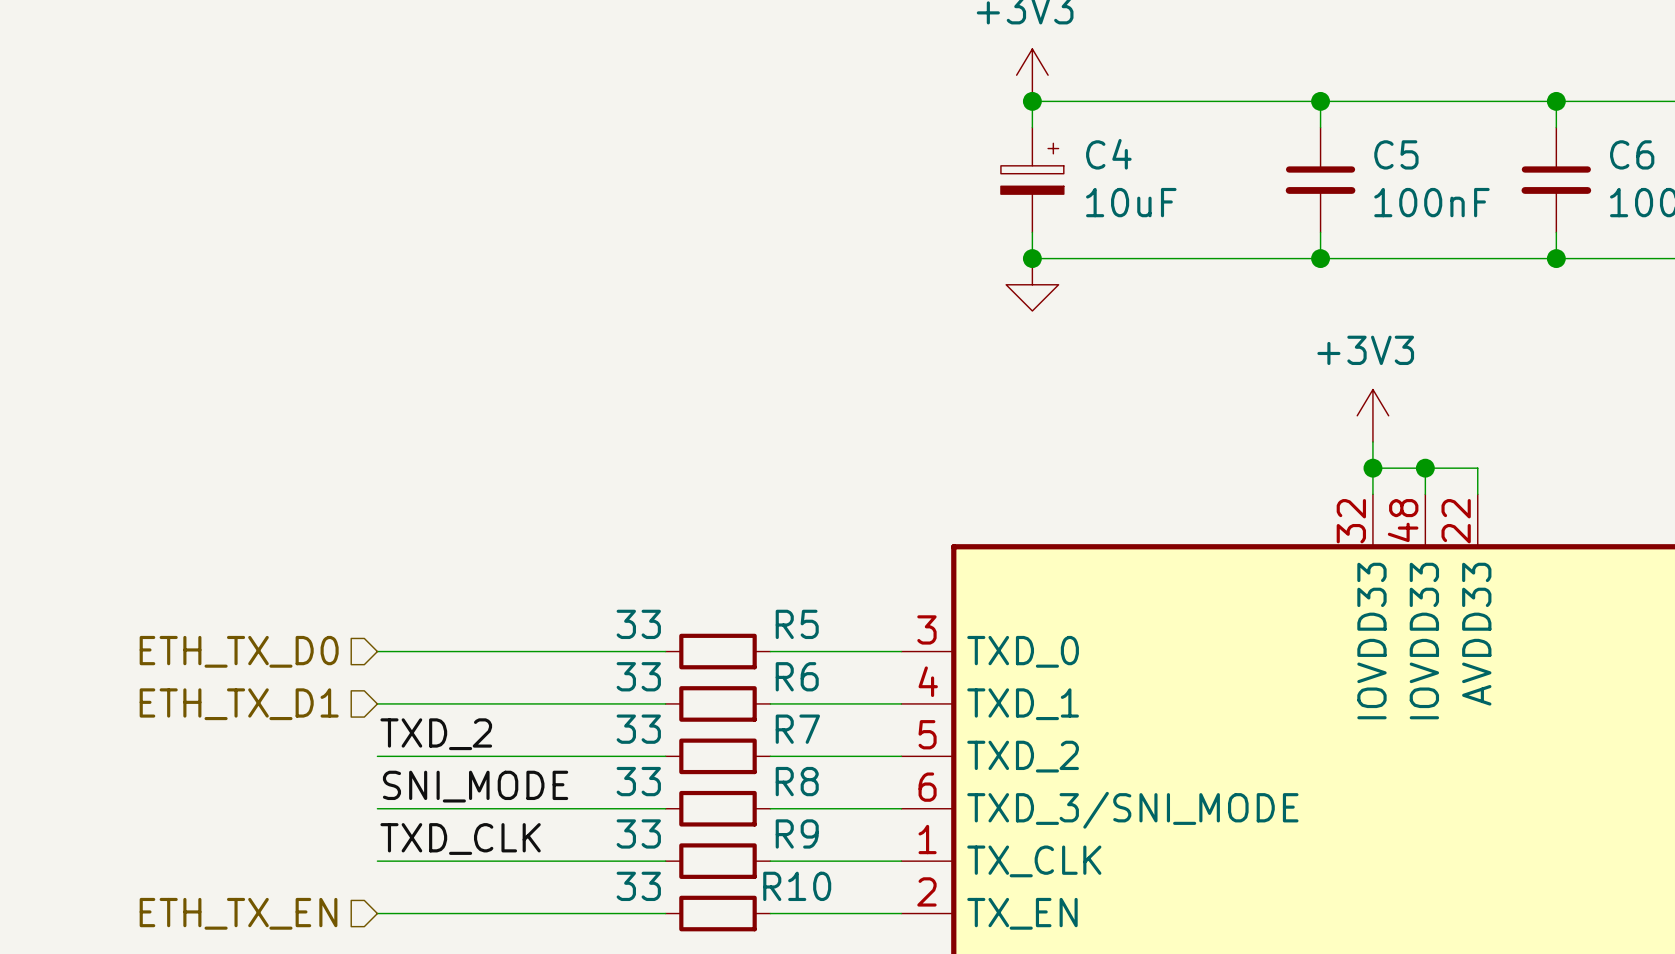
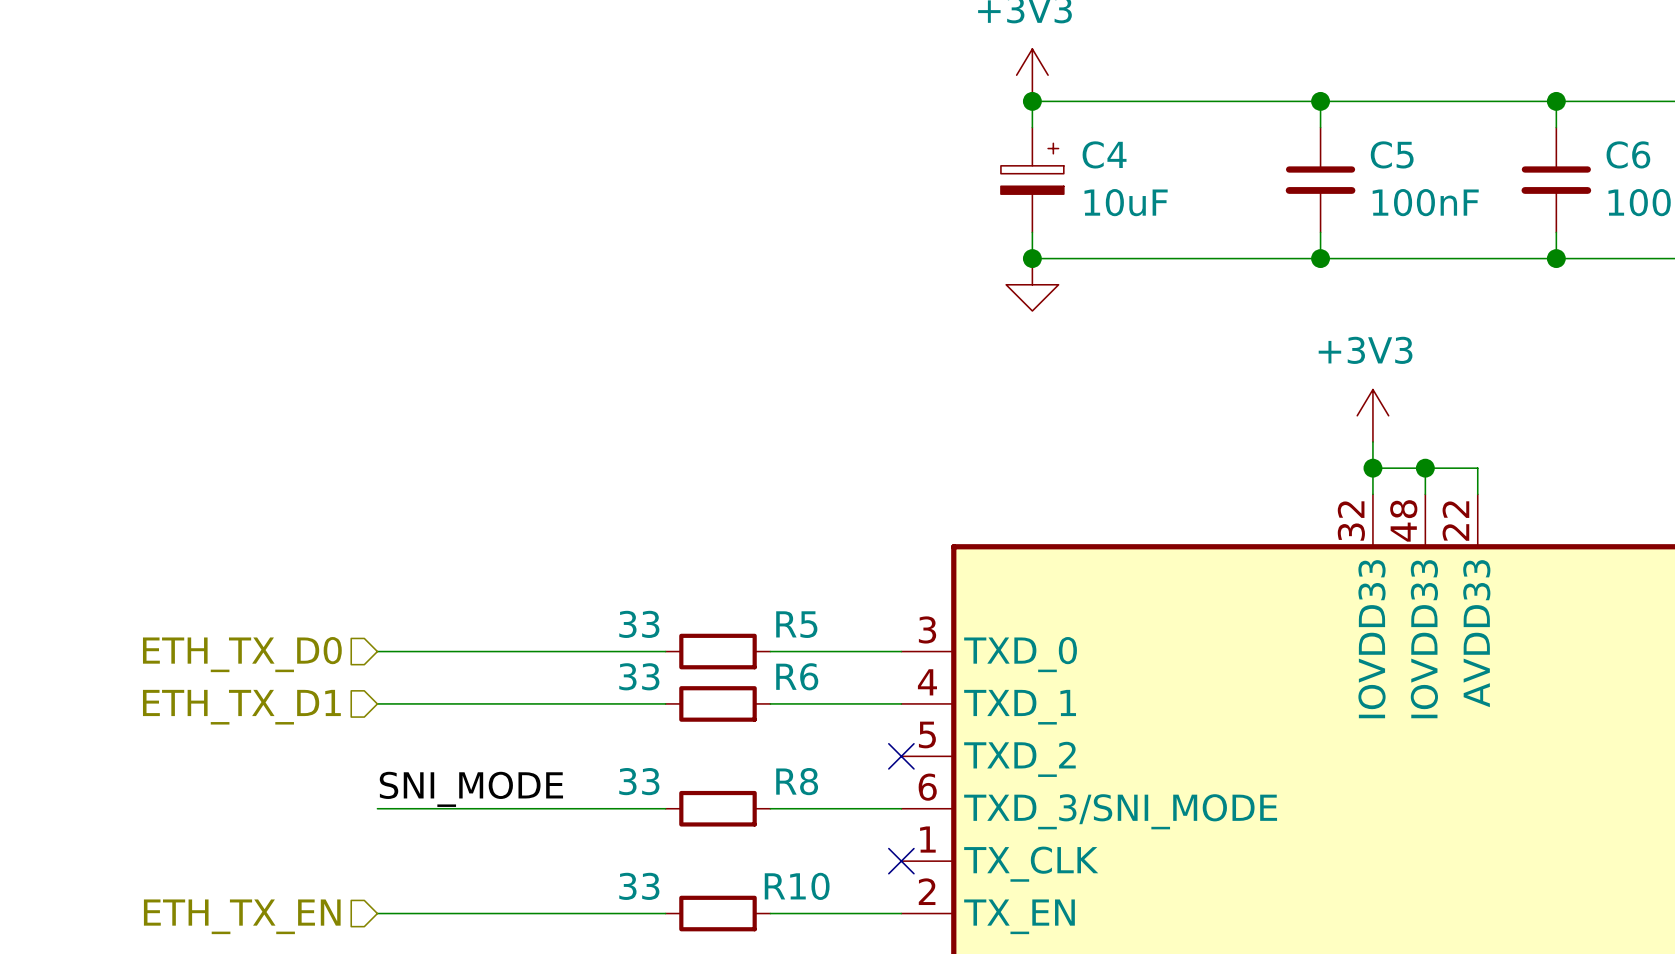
label: TXD_2 (436, 734) -> none
wire: (377, 756) (665, 756) -> none
R7: 33 (718, 756) -> none
wire: (770, 756) (901, 756) -> none
no-connect mark: none -> (901, 756)
label: TXD_CLK (460, 839) -> none
wire: (377, 861) (665, 861) -> none
R9: 33 (718, 861) -> none
wire: (770, 861) (901, 861) -> none
no-connect mark: none -> (901, 861)

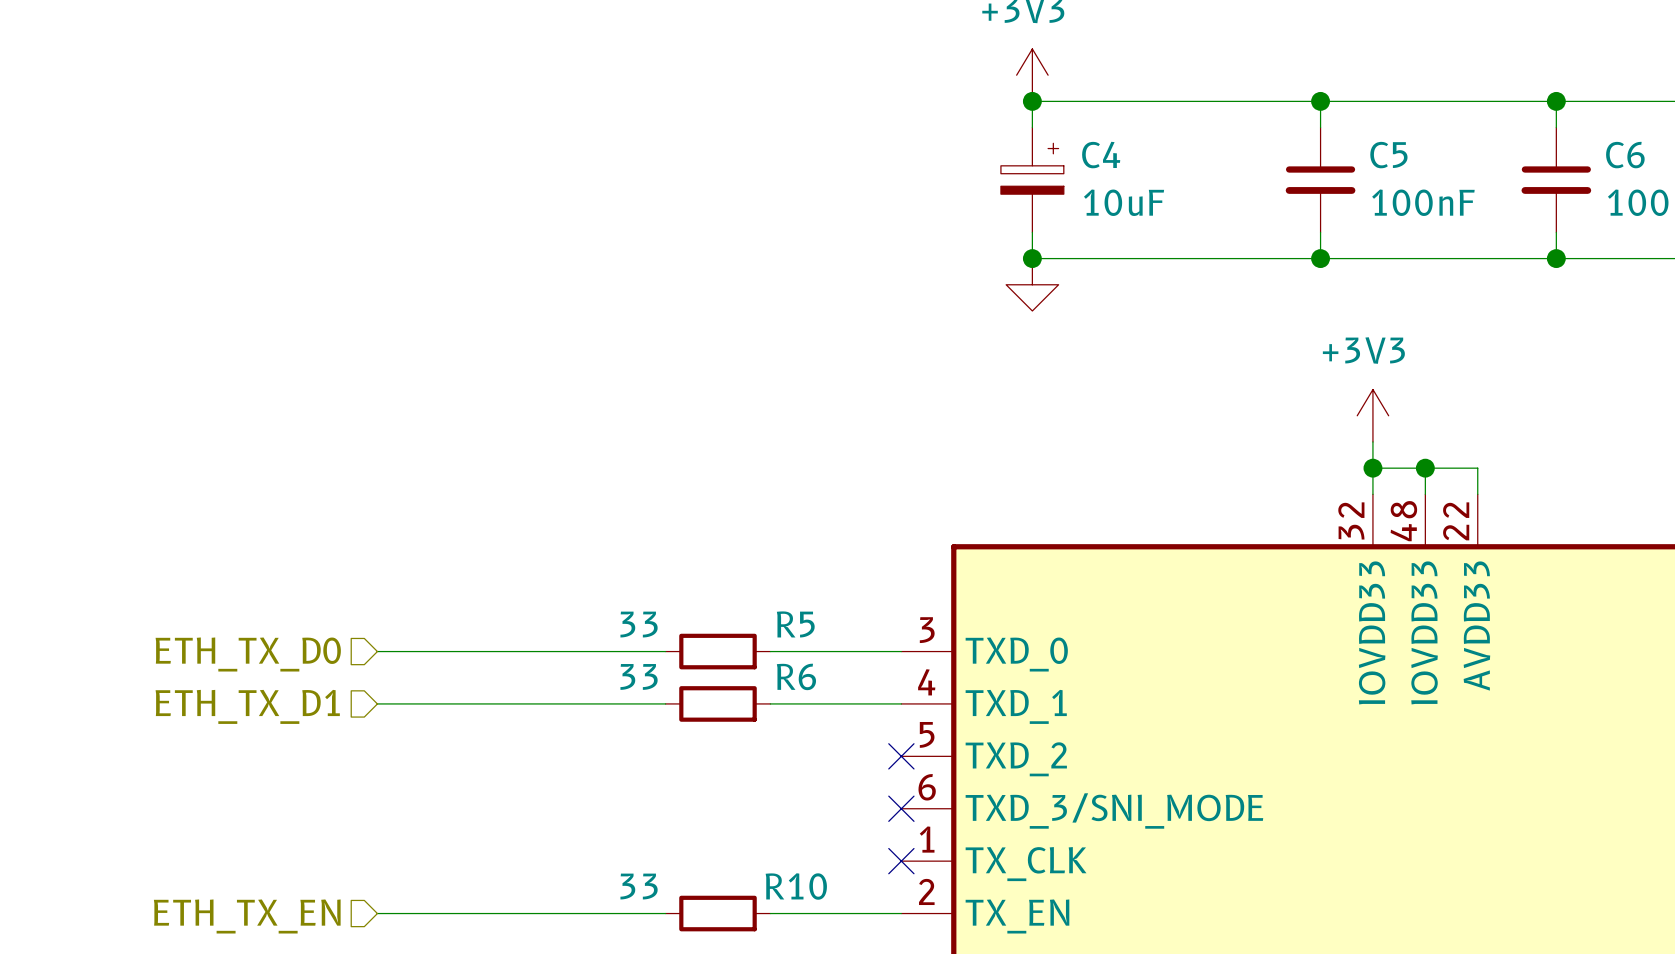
label: SNI_MODE (471, 789) -> none
wire: (377, 808) (665, 808) -> none
R8: 33 (718, 808) -> none
wire: (770, 808) (901, 808) -> none
no-connect mark: none -> (901, 808)

